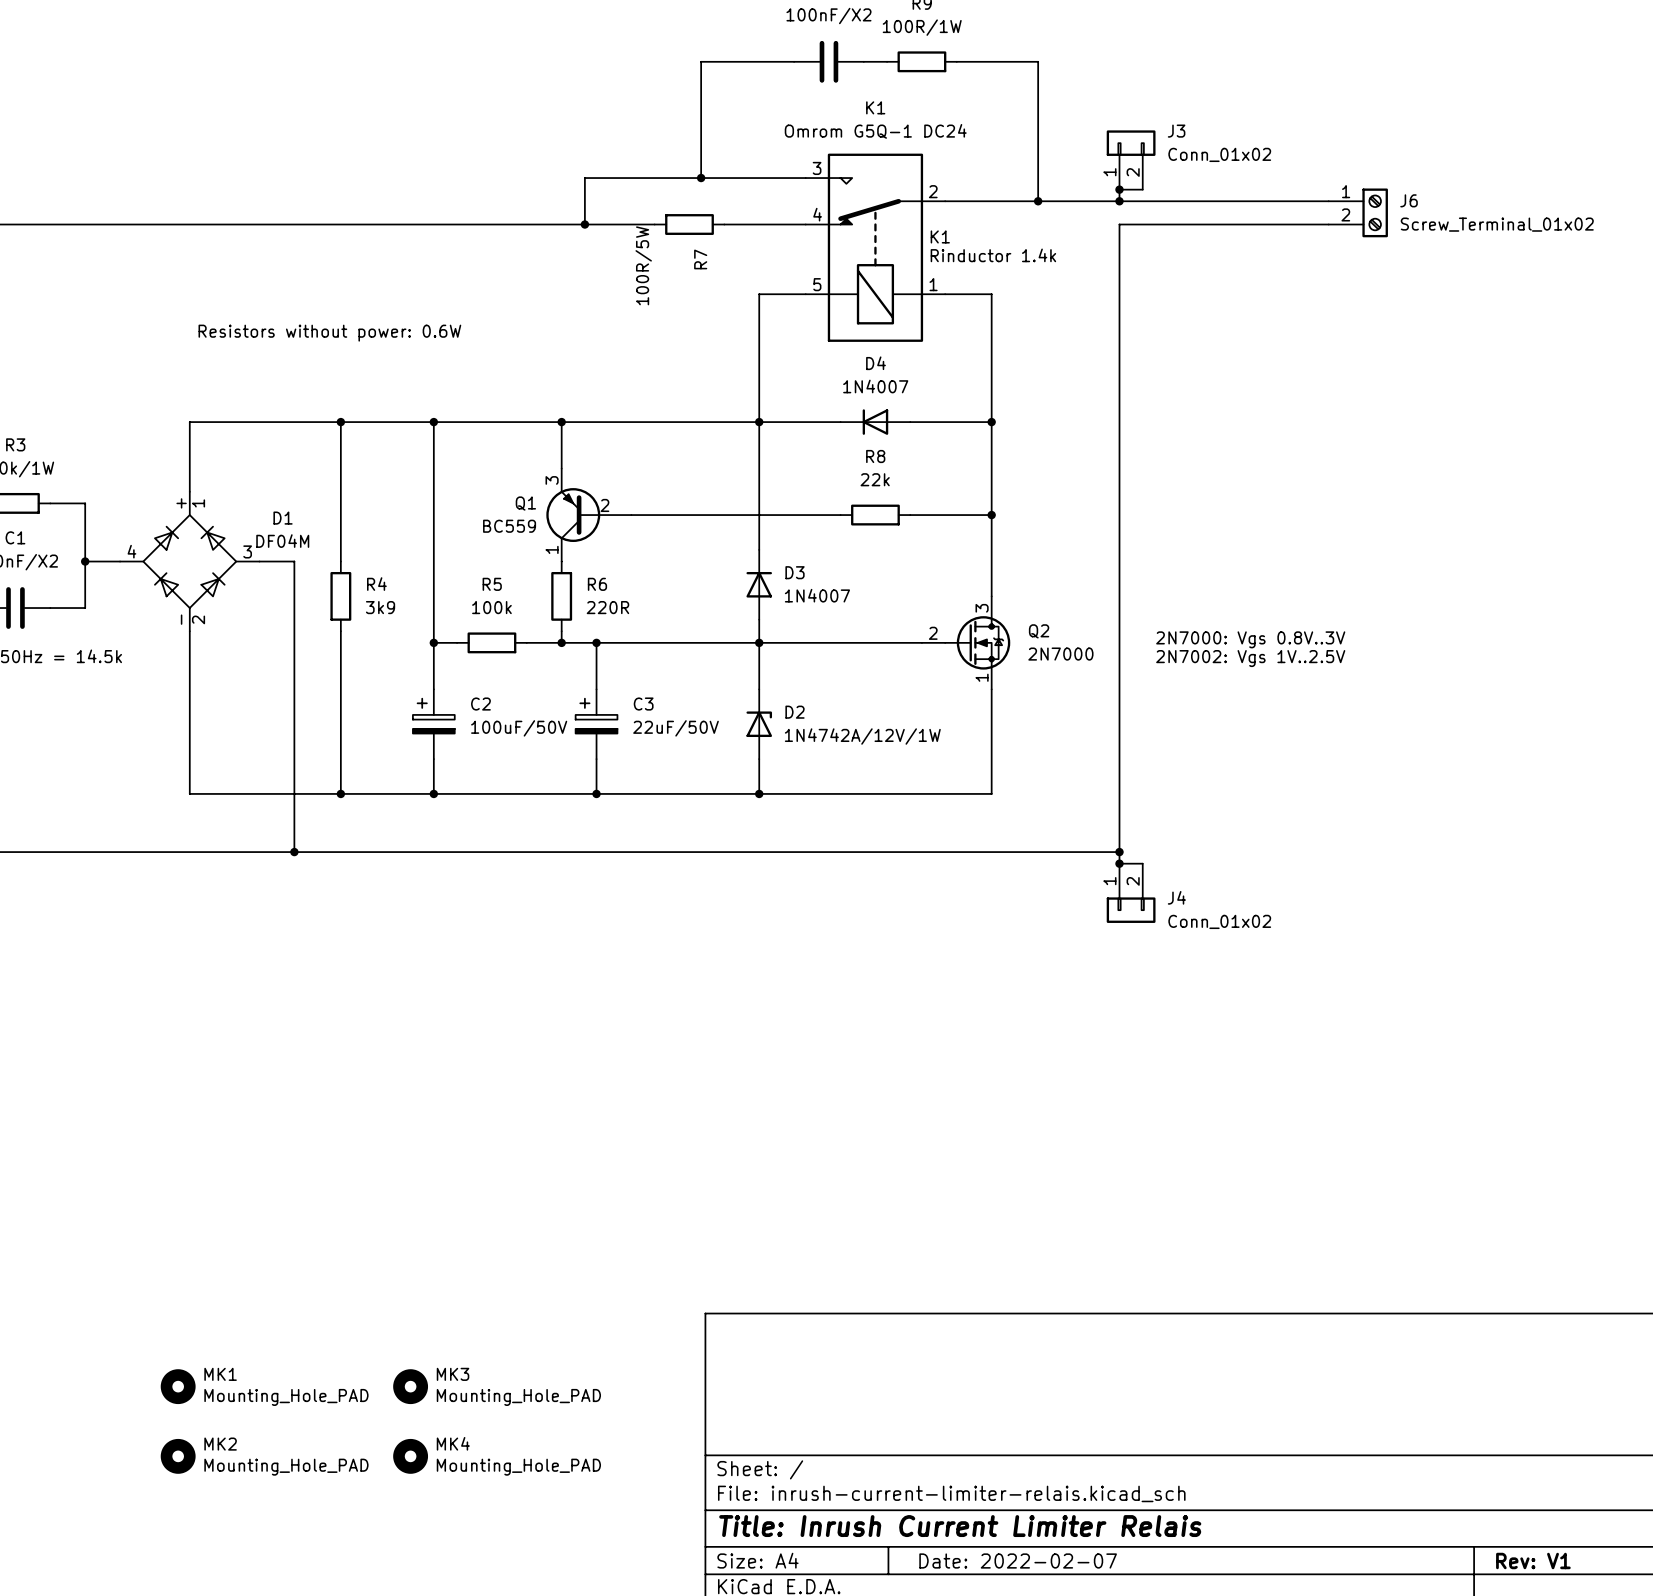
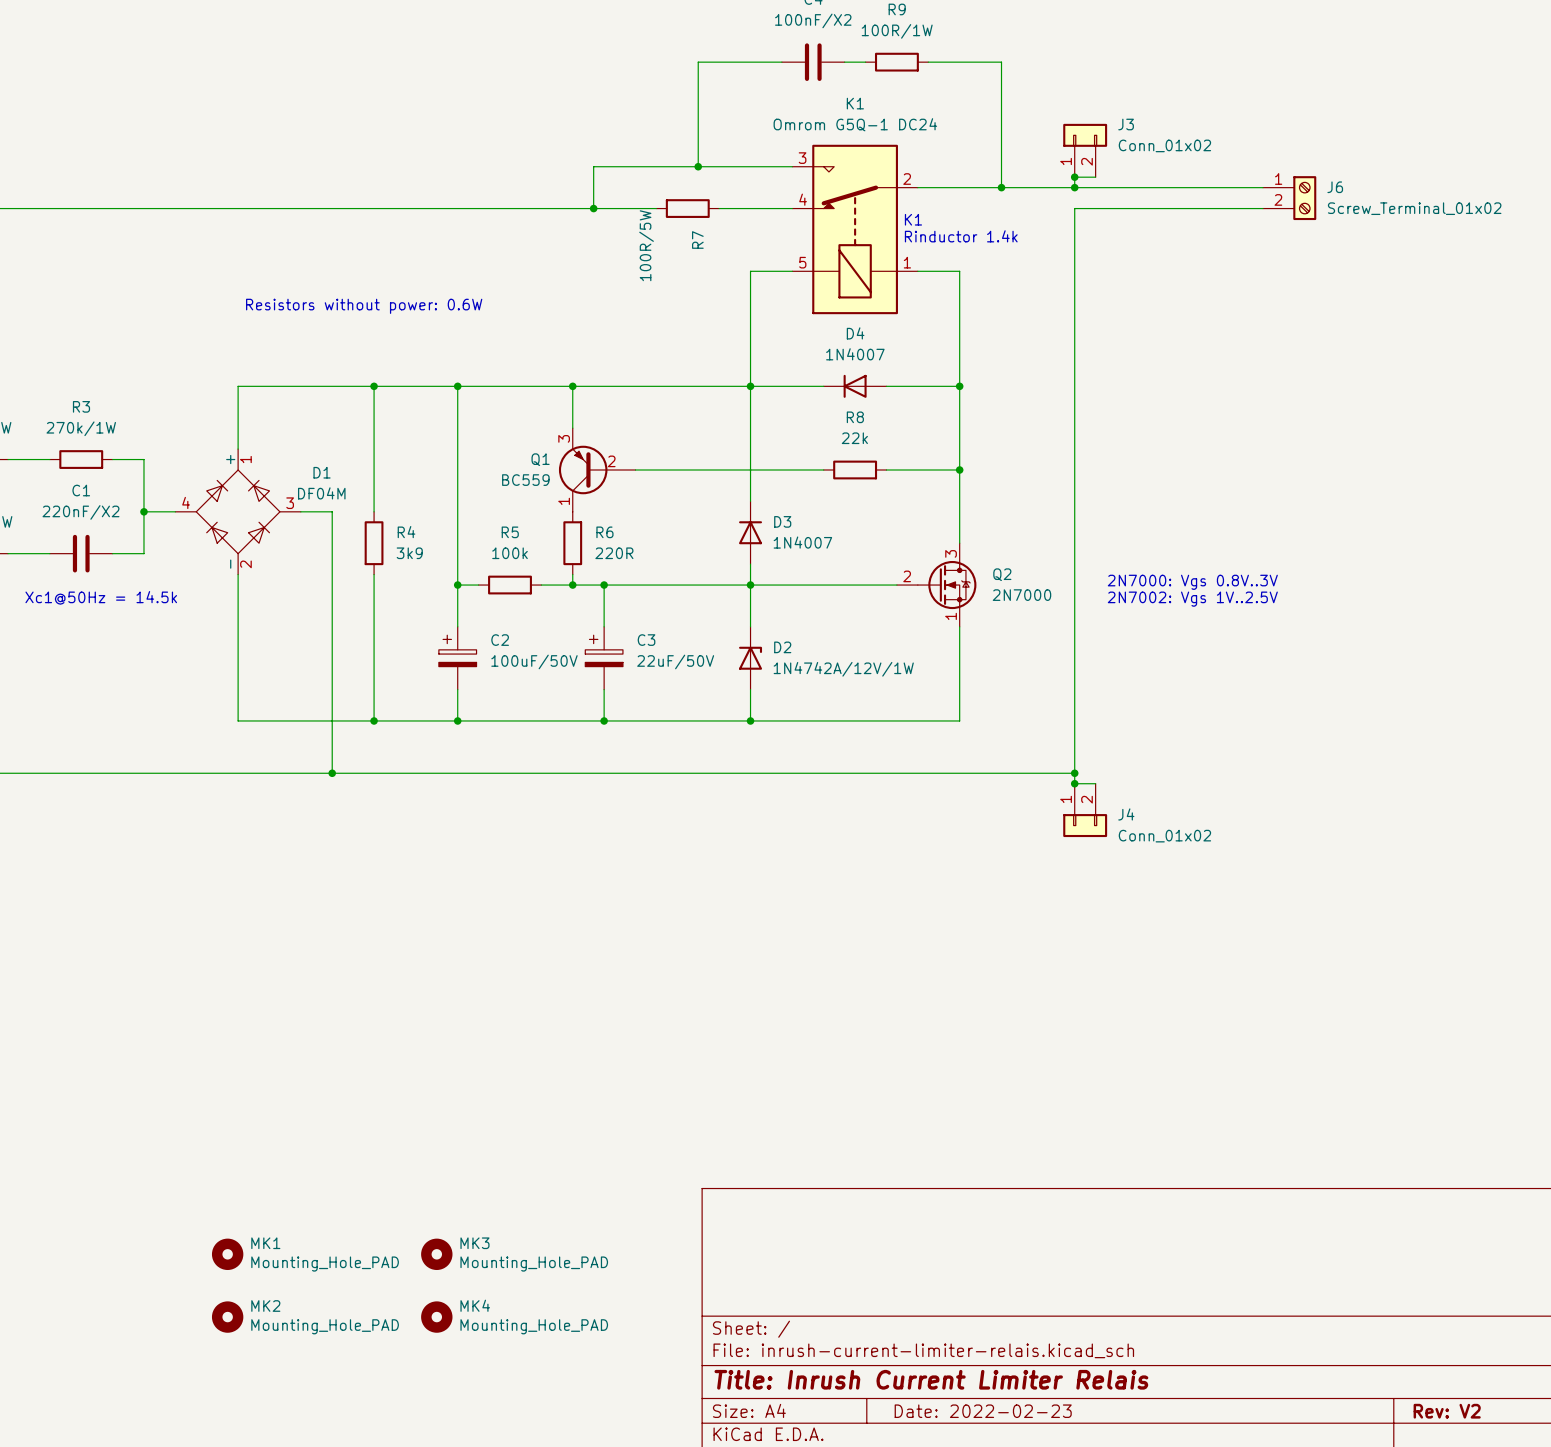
title block: Date: 2022-02-07 (1018, 1561) -> Date: 2022-02-23 (983, 1411)
title block: Rev: V1 (1533, 1561) -> Rev: V2 (1447, 1411)

